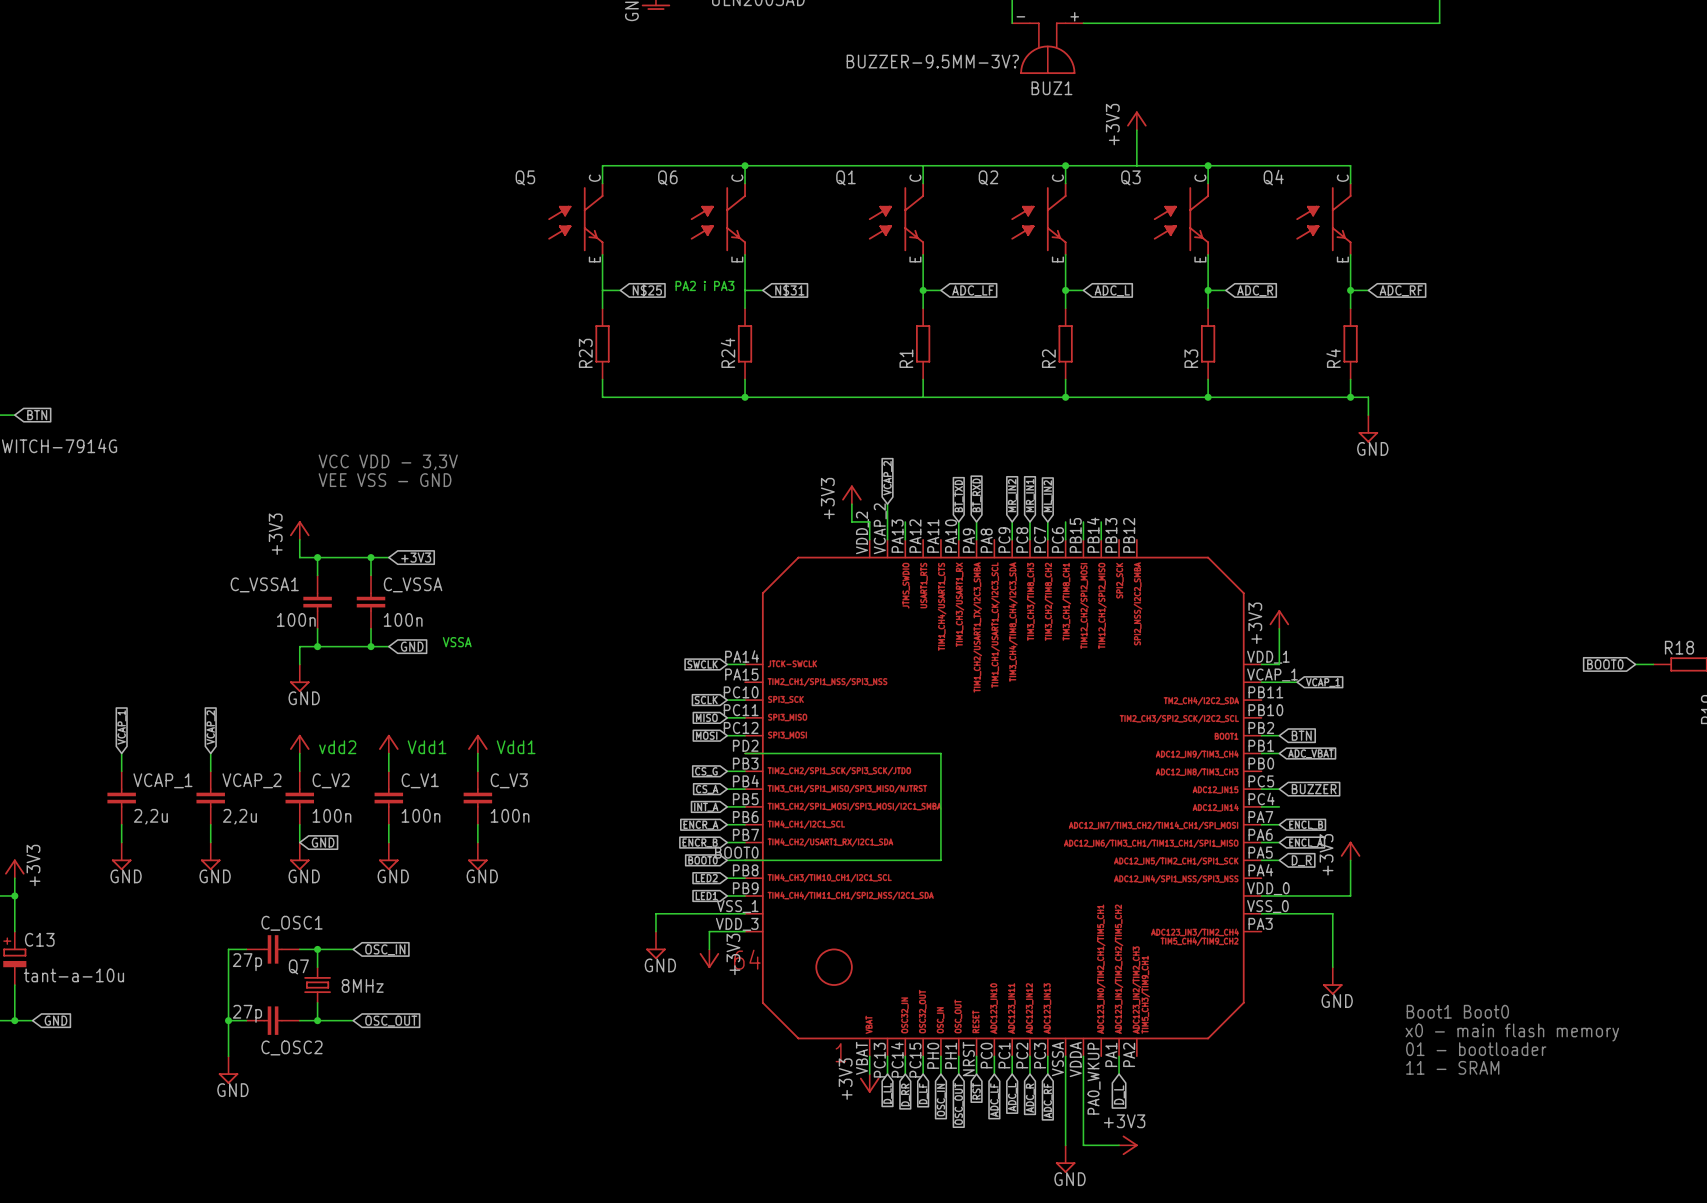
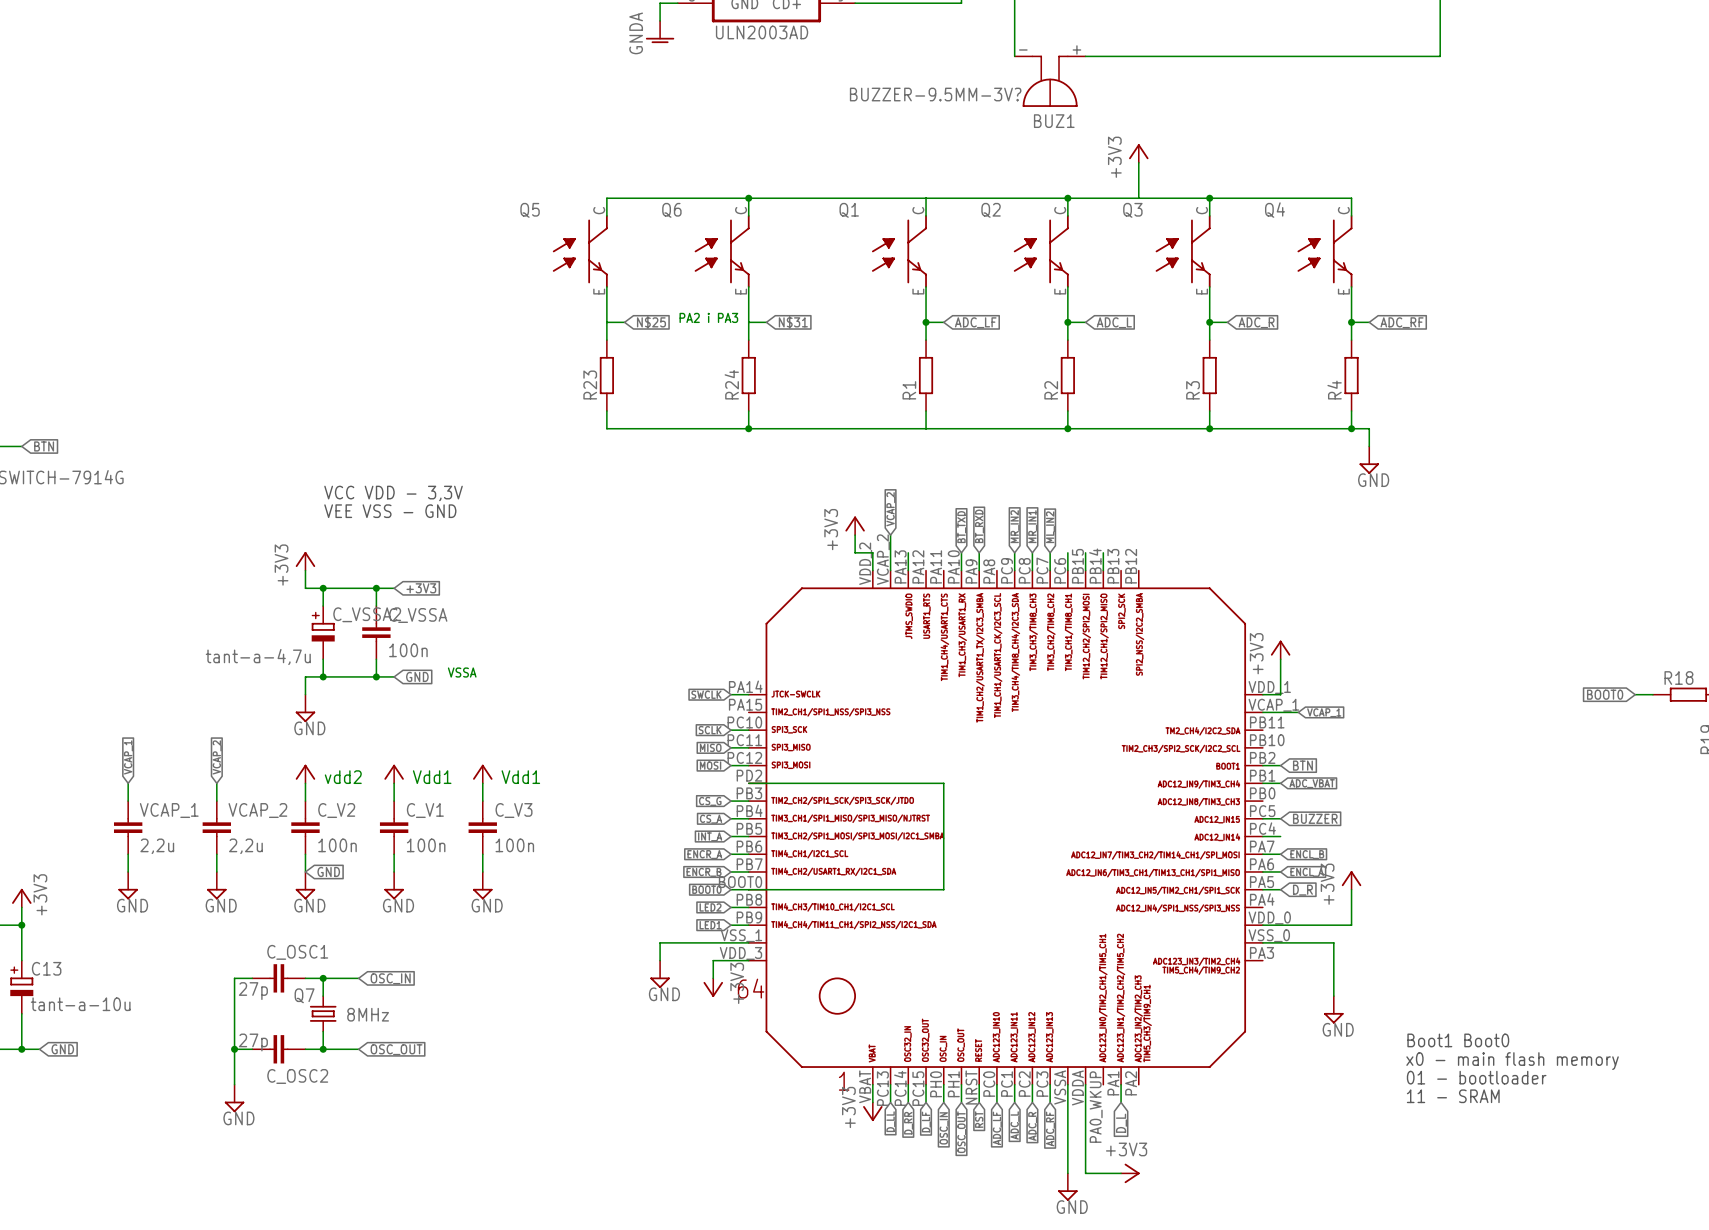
C_VSSA1: 100n (317, 602) -> none
C_VSSA2: none -> tant-a-4,7u (323, 632)

